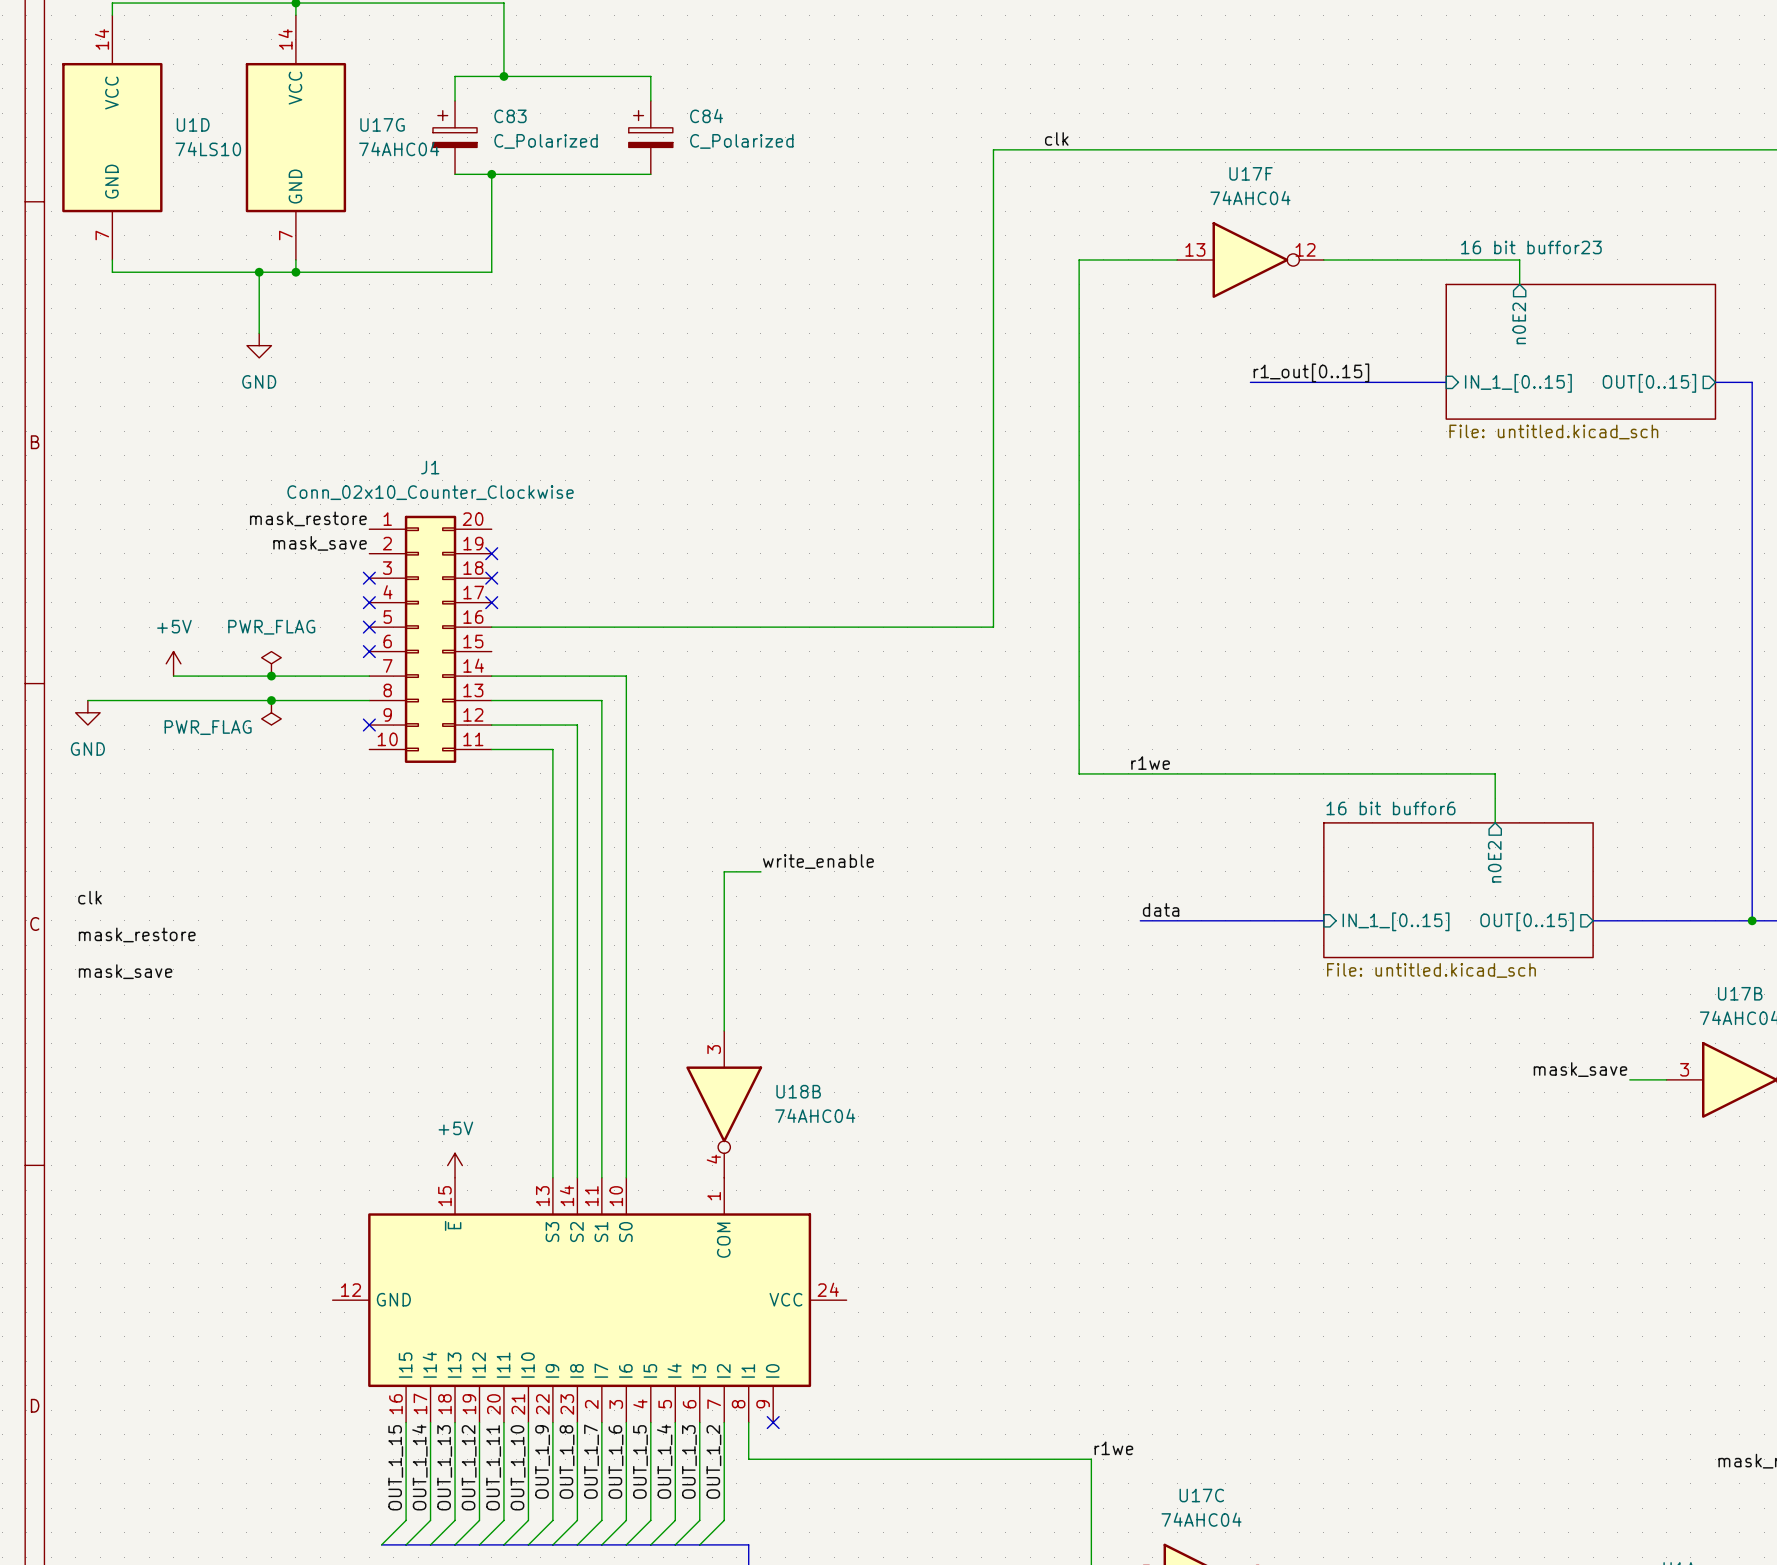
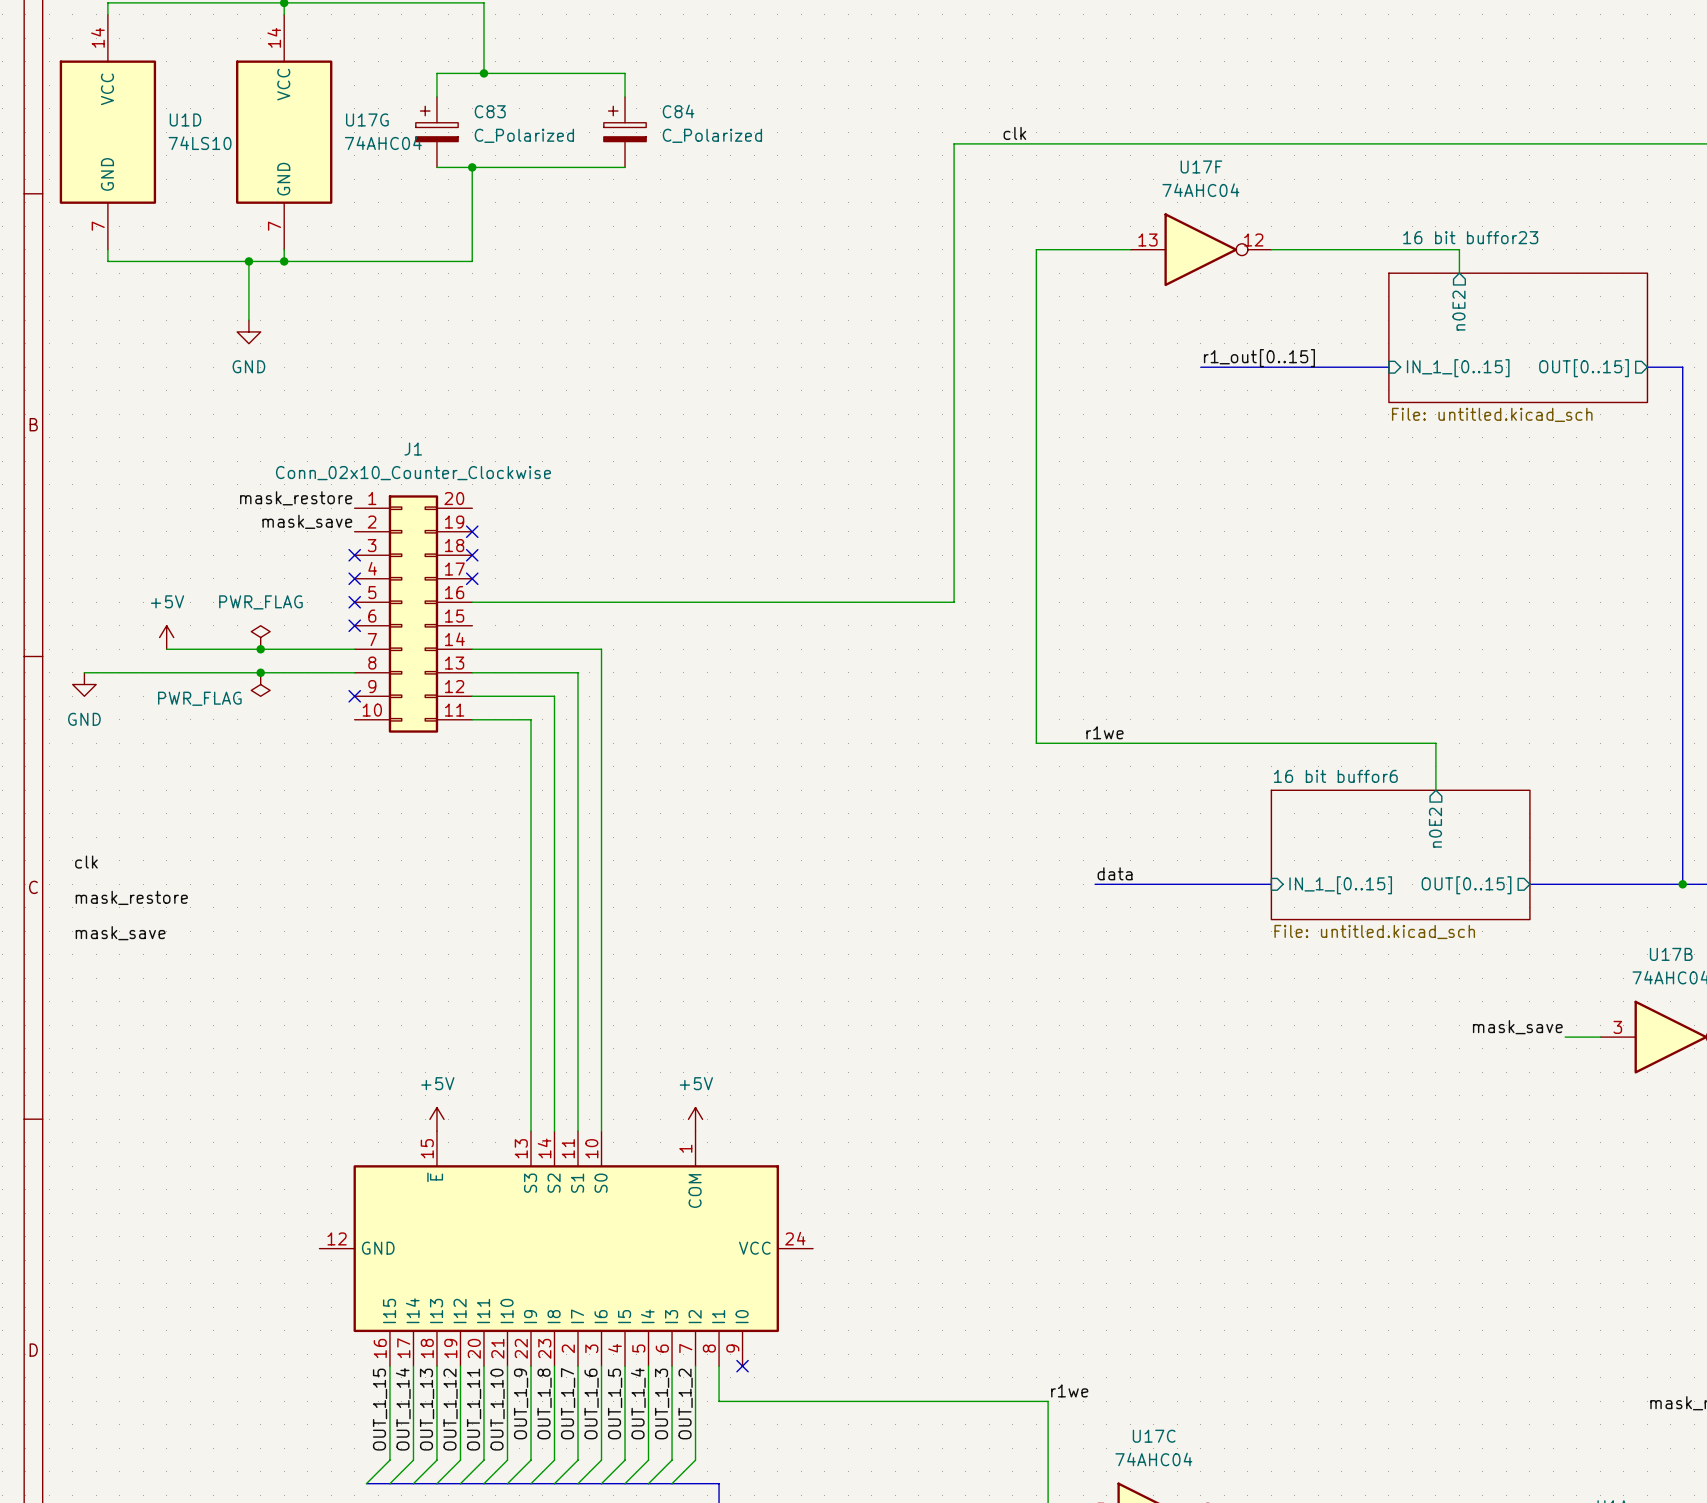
label: write_enable (818, 861) -> none
wire: (760, 871) (724, 871) (724, 1030) -> none
U18B: 74AHC04 (724, 1104) -> none
power symbol: none -> +5V (695, 1119)

